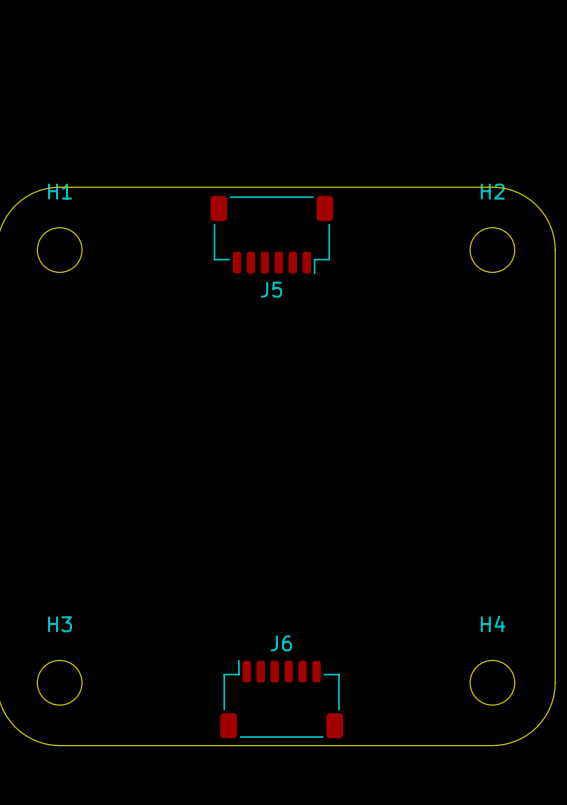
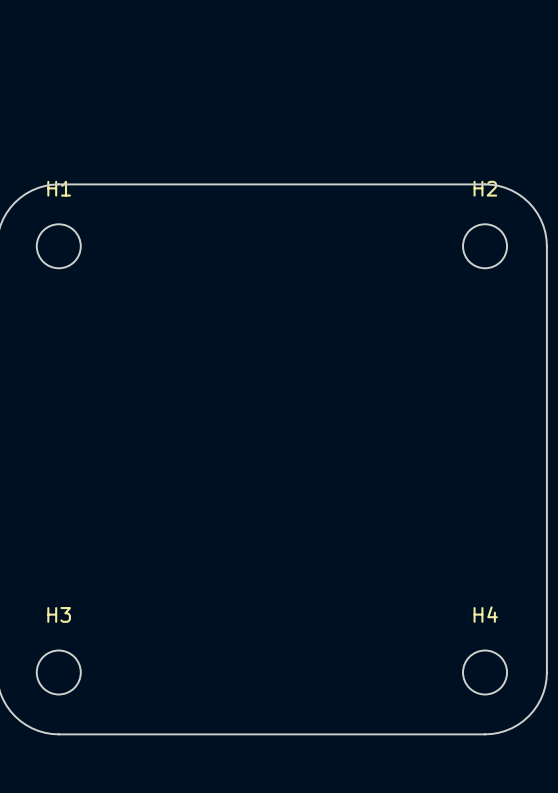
J5: (271, 235) -> none
J6: (281, 699) -> none

